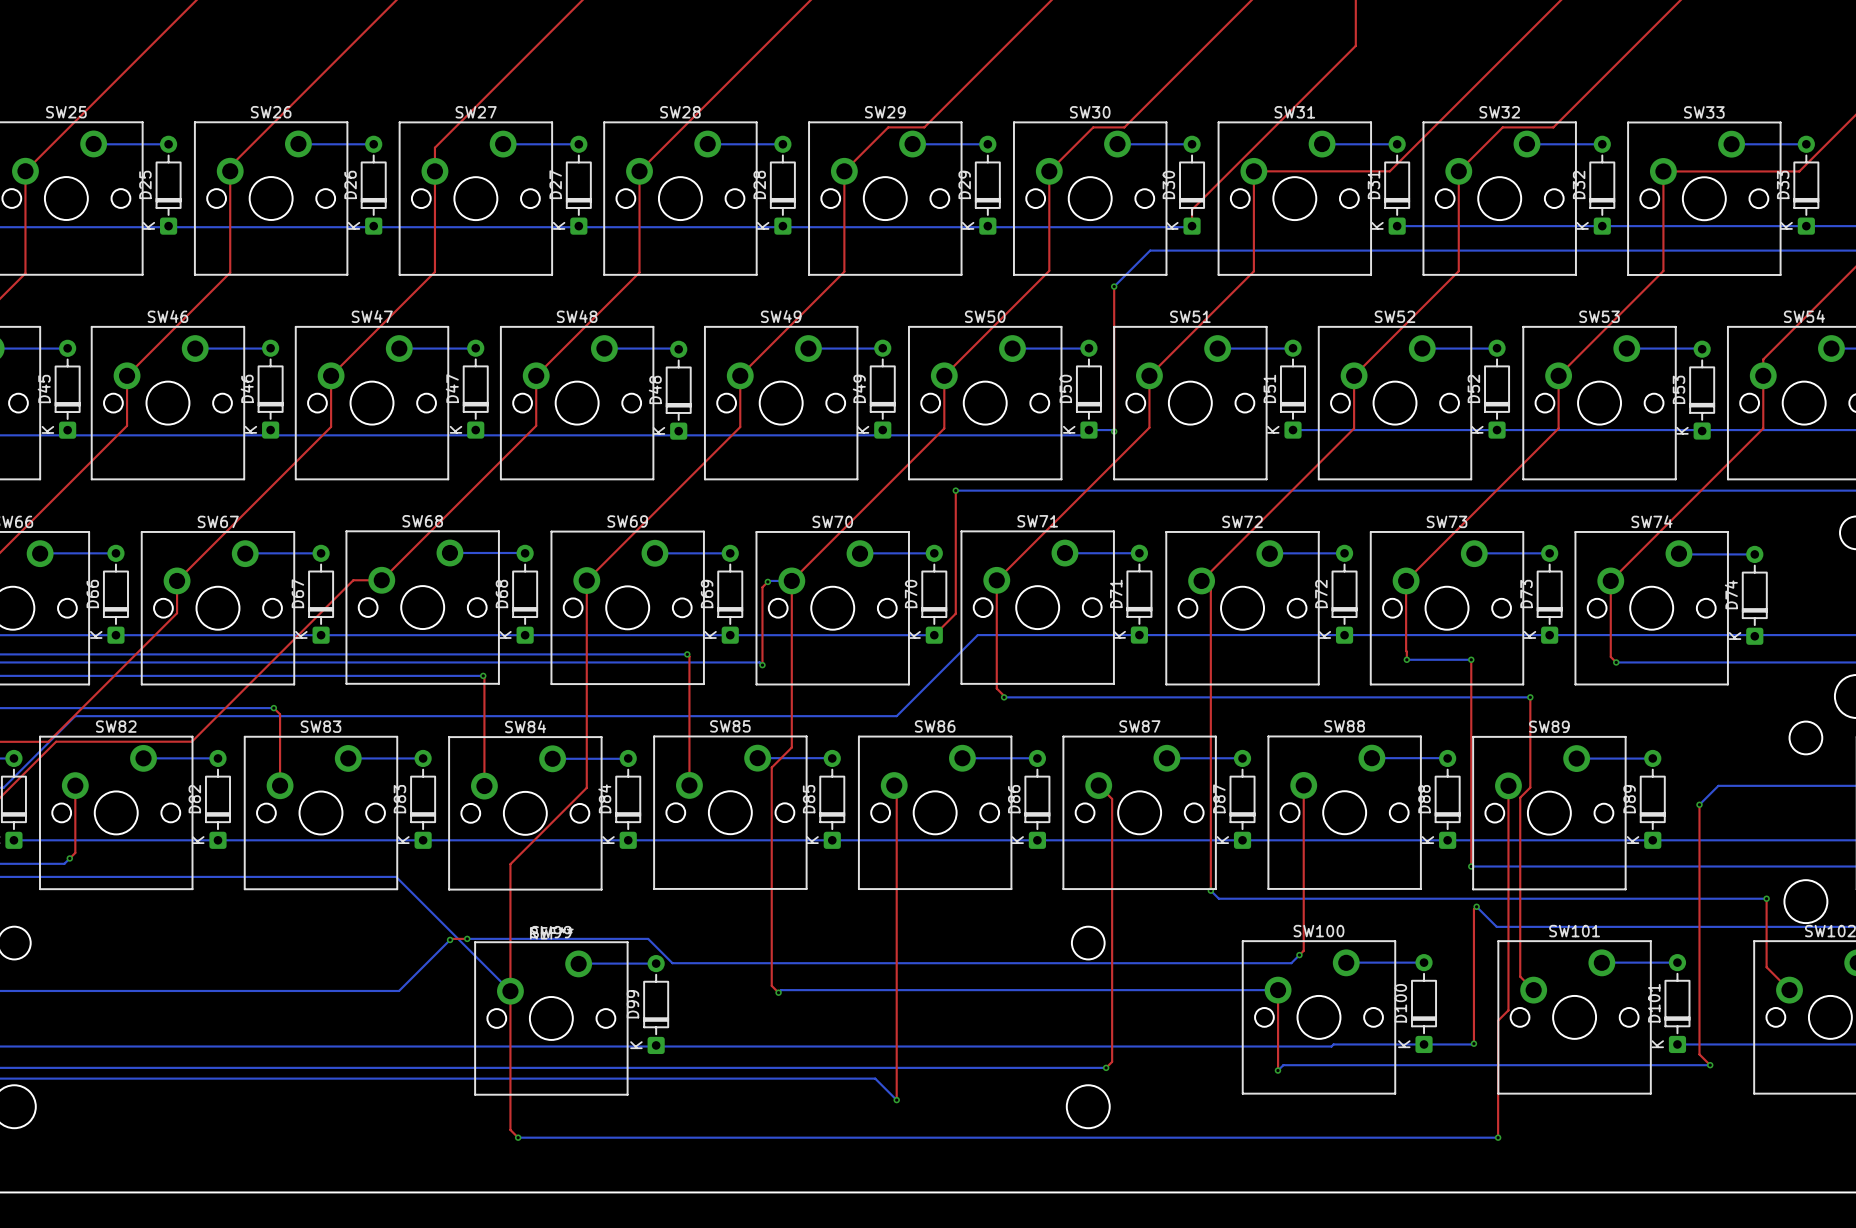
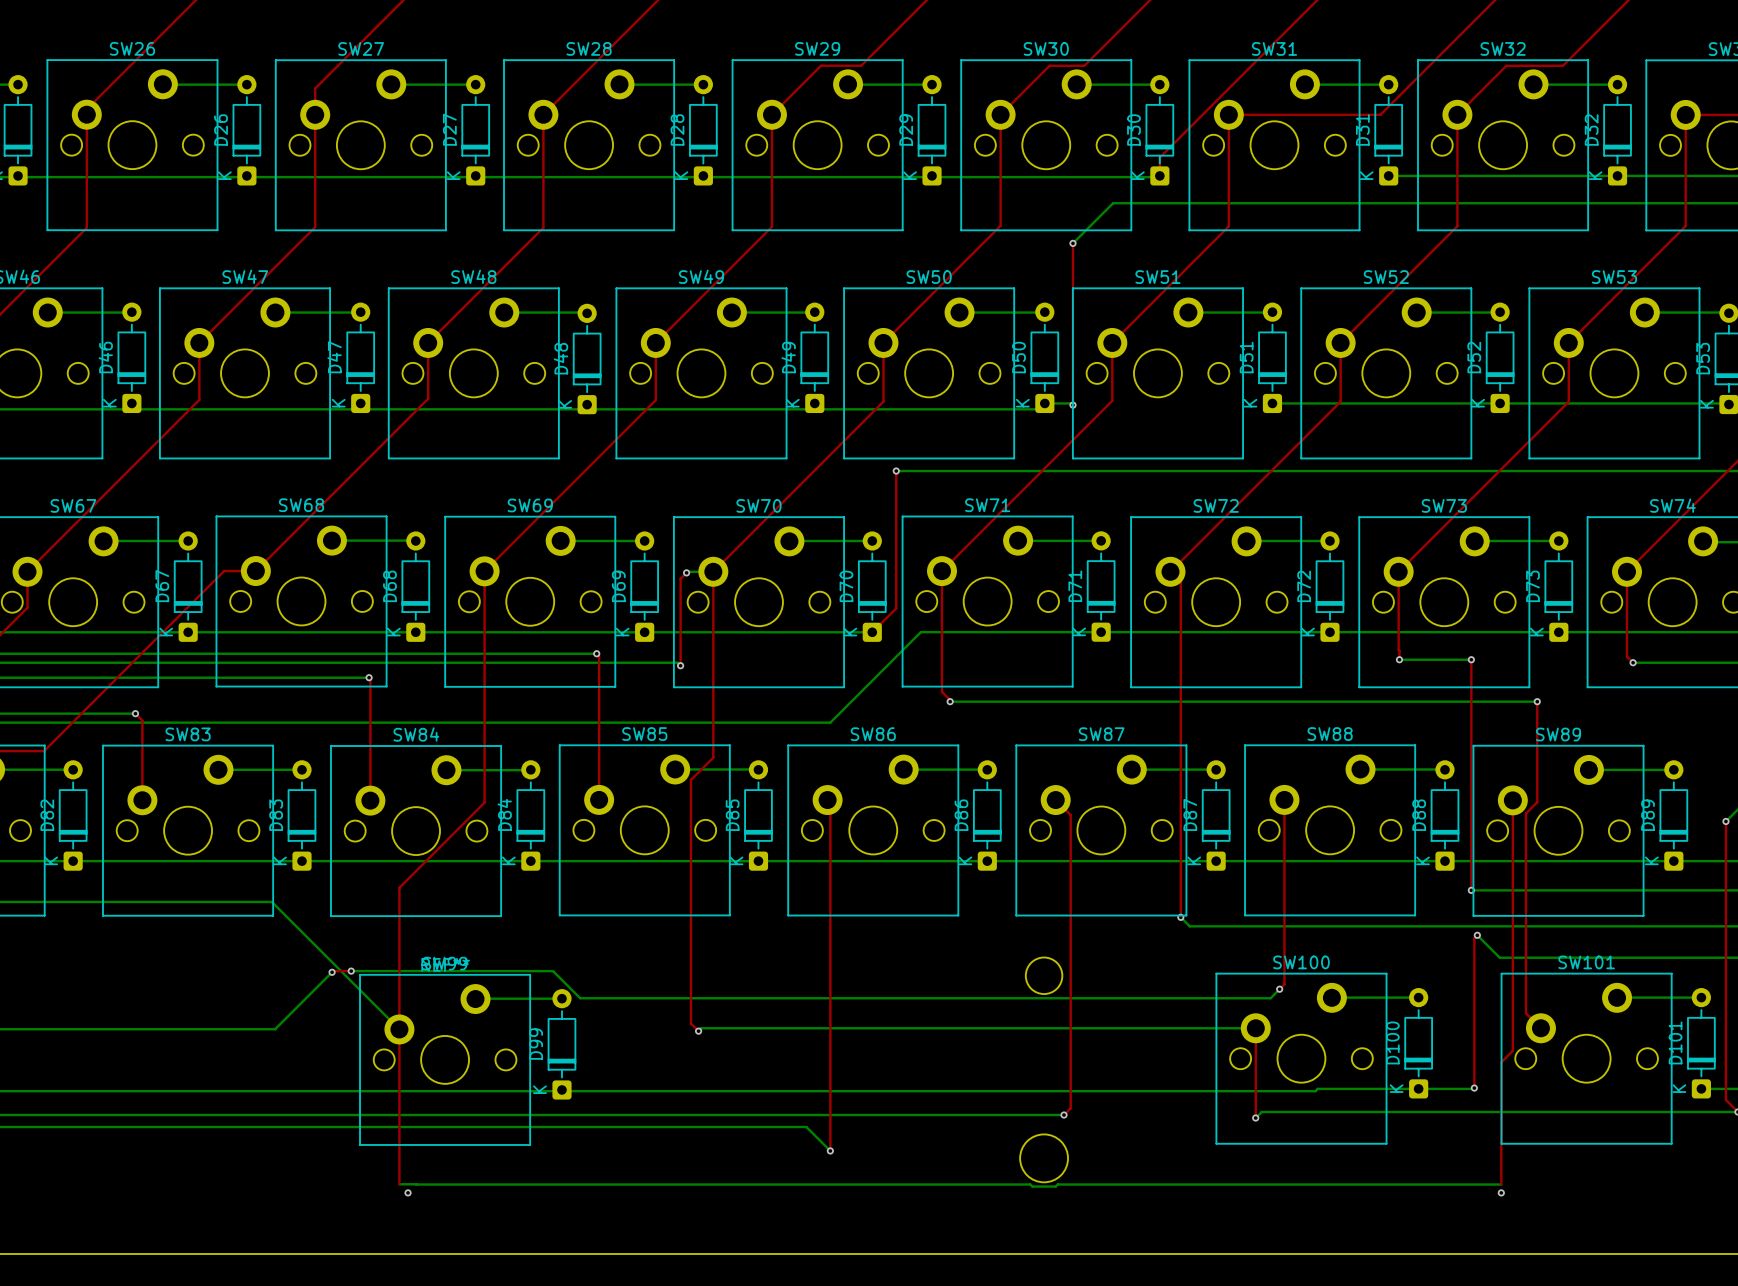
top track: (510, 1129) (518, 1137) -> none
bottom track: none -> (399, 1184) (1030, 1184) (1032, 1186) (1055, 1186) (1057, 1184) (1501, 1184)
top track: (1498, 1130) (1498, 1137) -> none
bottom track: (518, 1137) (1498, 1137) -> none

